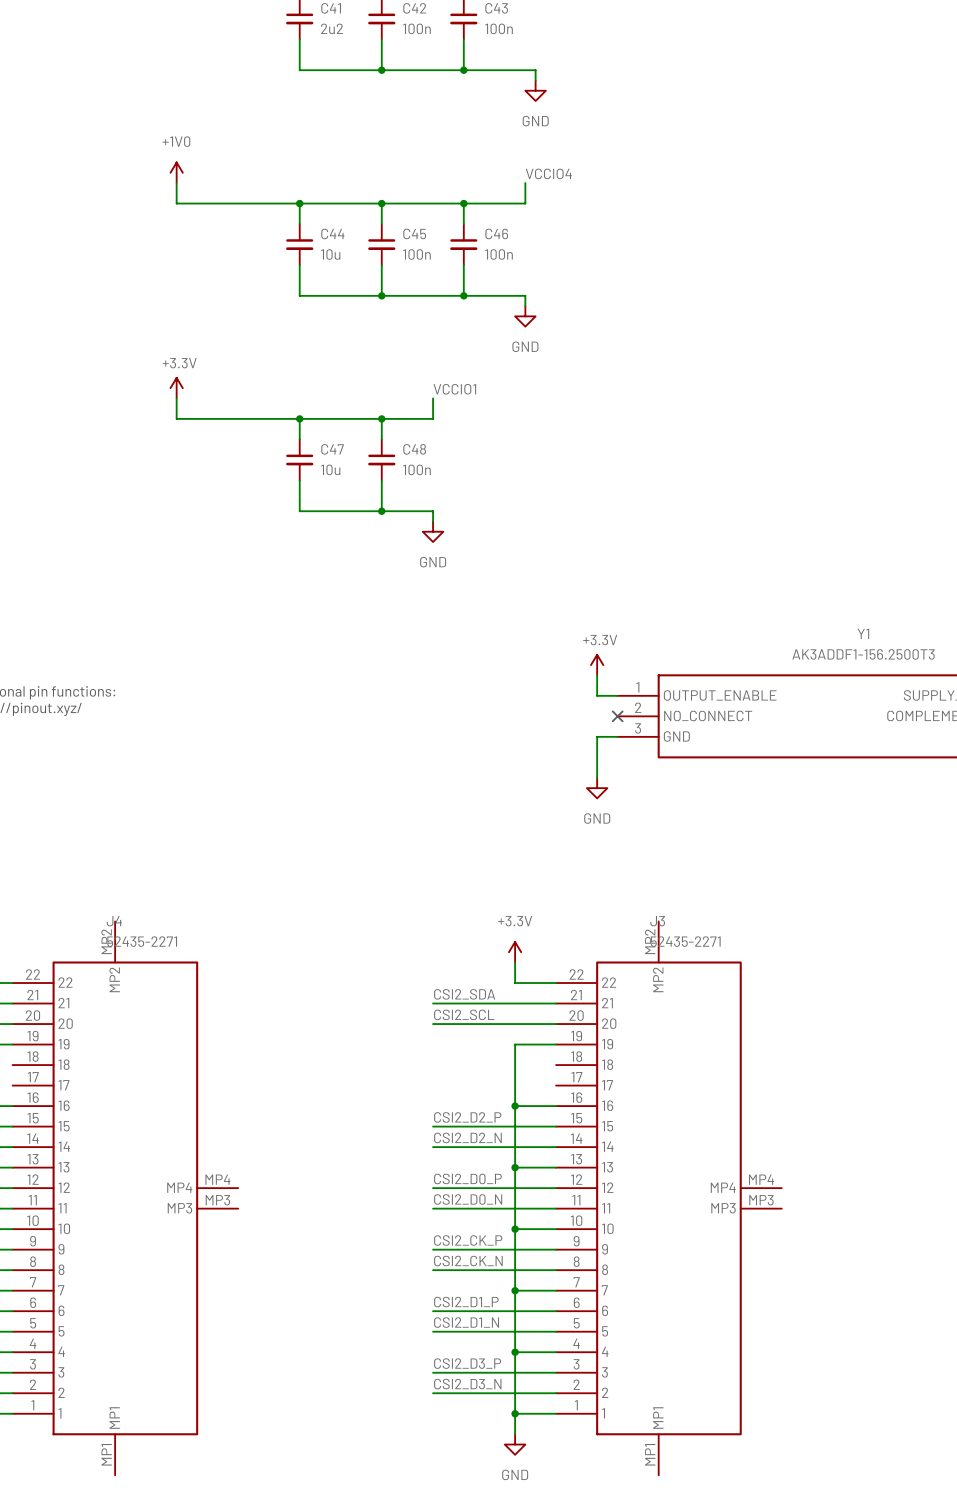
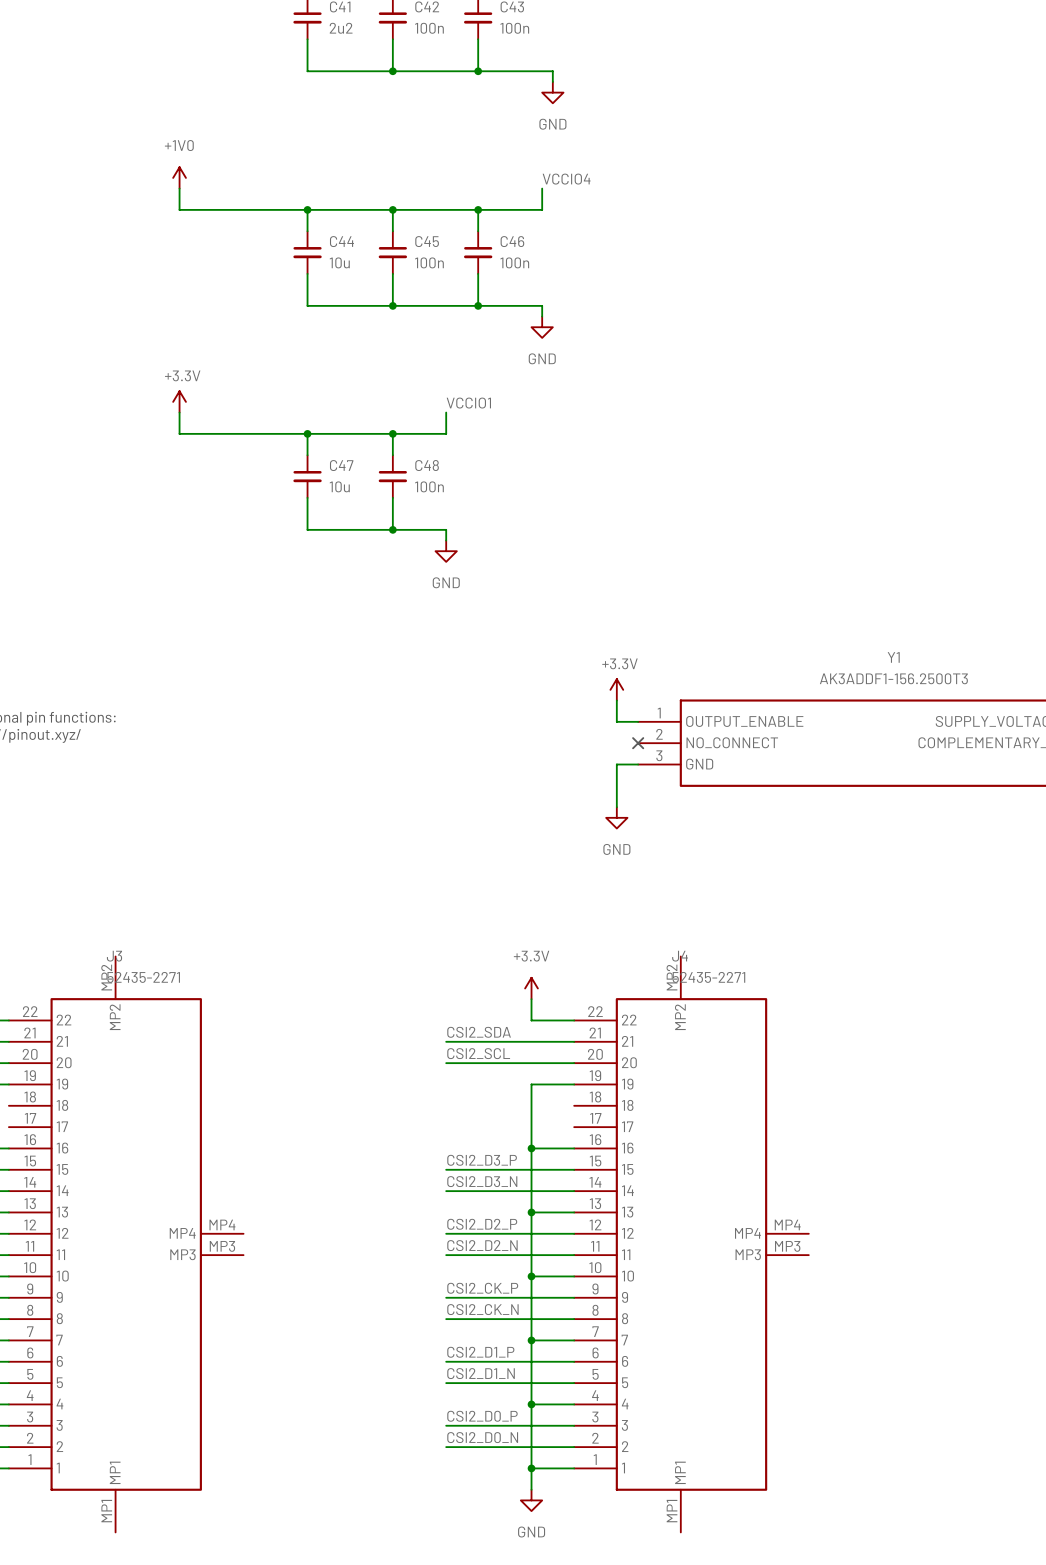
J4 name: J4 (114, 921) -> J3 (114, 956)
J3 name: J3 (657, 921) -> J4 (680, 956)
label: CSI2_D2_P (467, 1117) -> CSI2_D3_P (482, 1160)
label: CSI2_D2_N (467, 1137) -> CSI2_D3_N (482, 1181)
label: CSI2_D0_P (467, 1178) -> CSI2_D2_P (482, 1224)
label: CSI2_D0_N (468, 1199) -> CSI2_D2_N (482, 1245)
label: CSI2_D3_P (467, 1363) -> CSI2_D0_P (482, 1416)
label: CSI2_D3_N (467, 1384) -> CSI2_D0_N (482, 1437)

